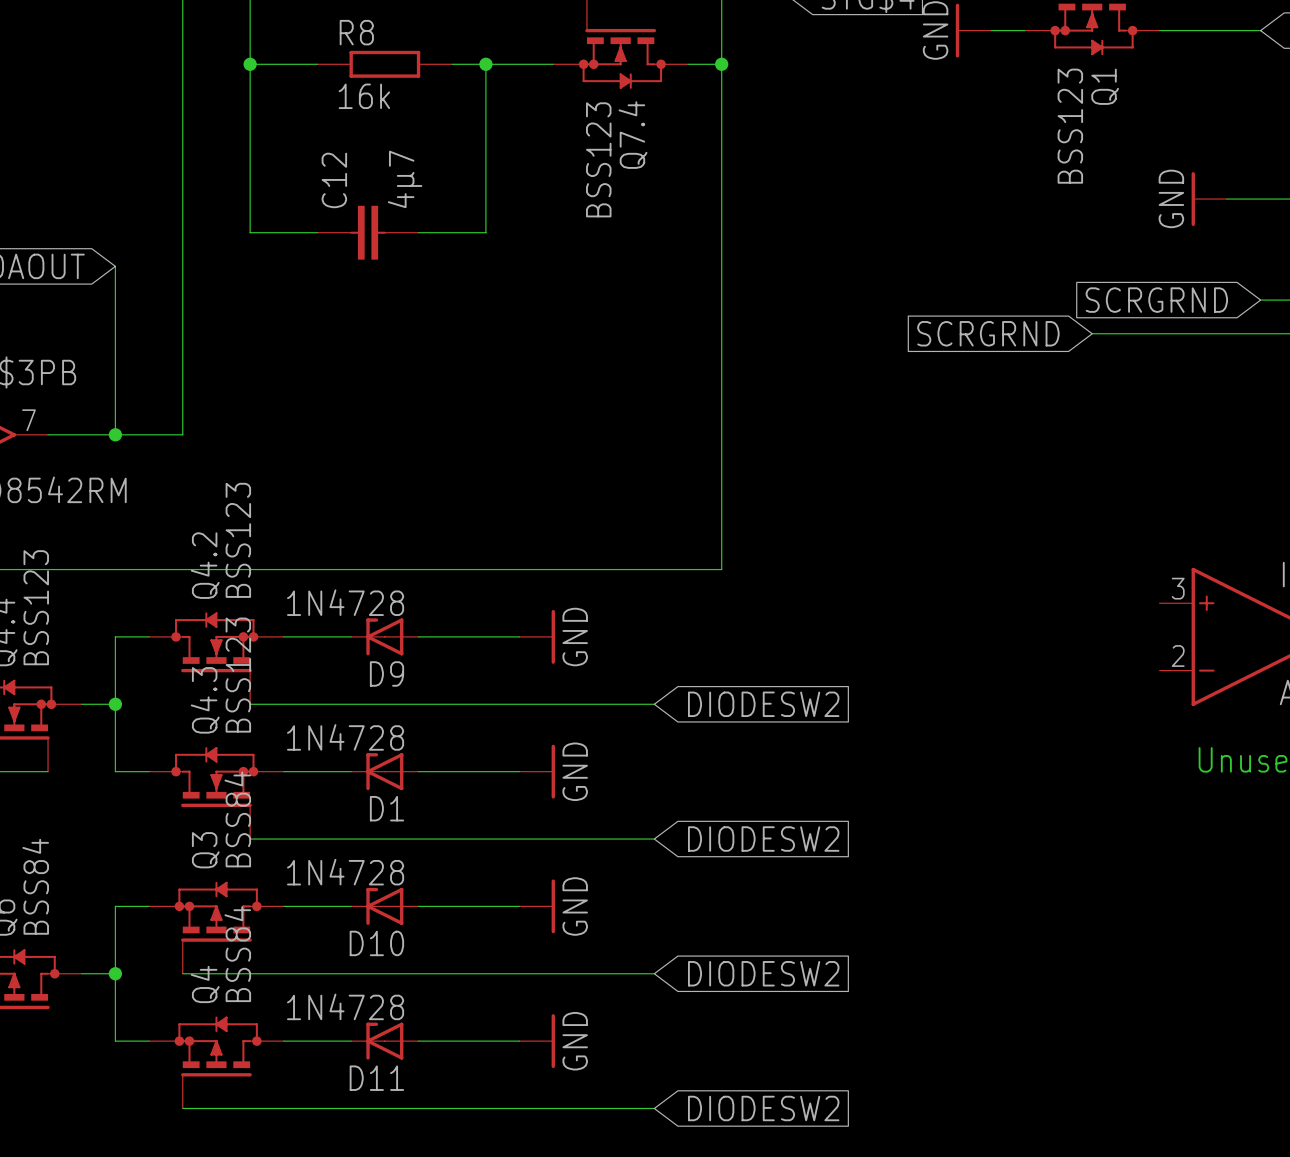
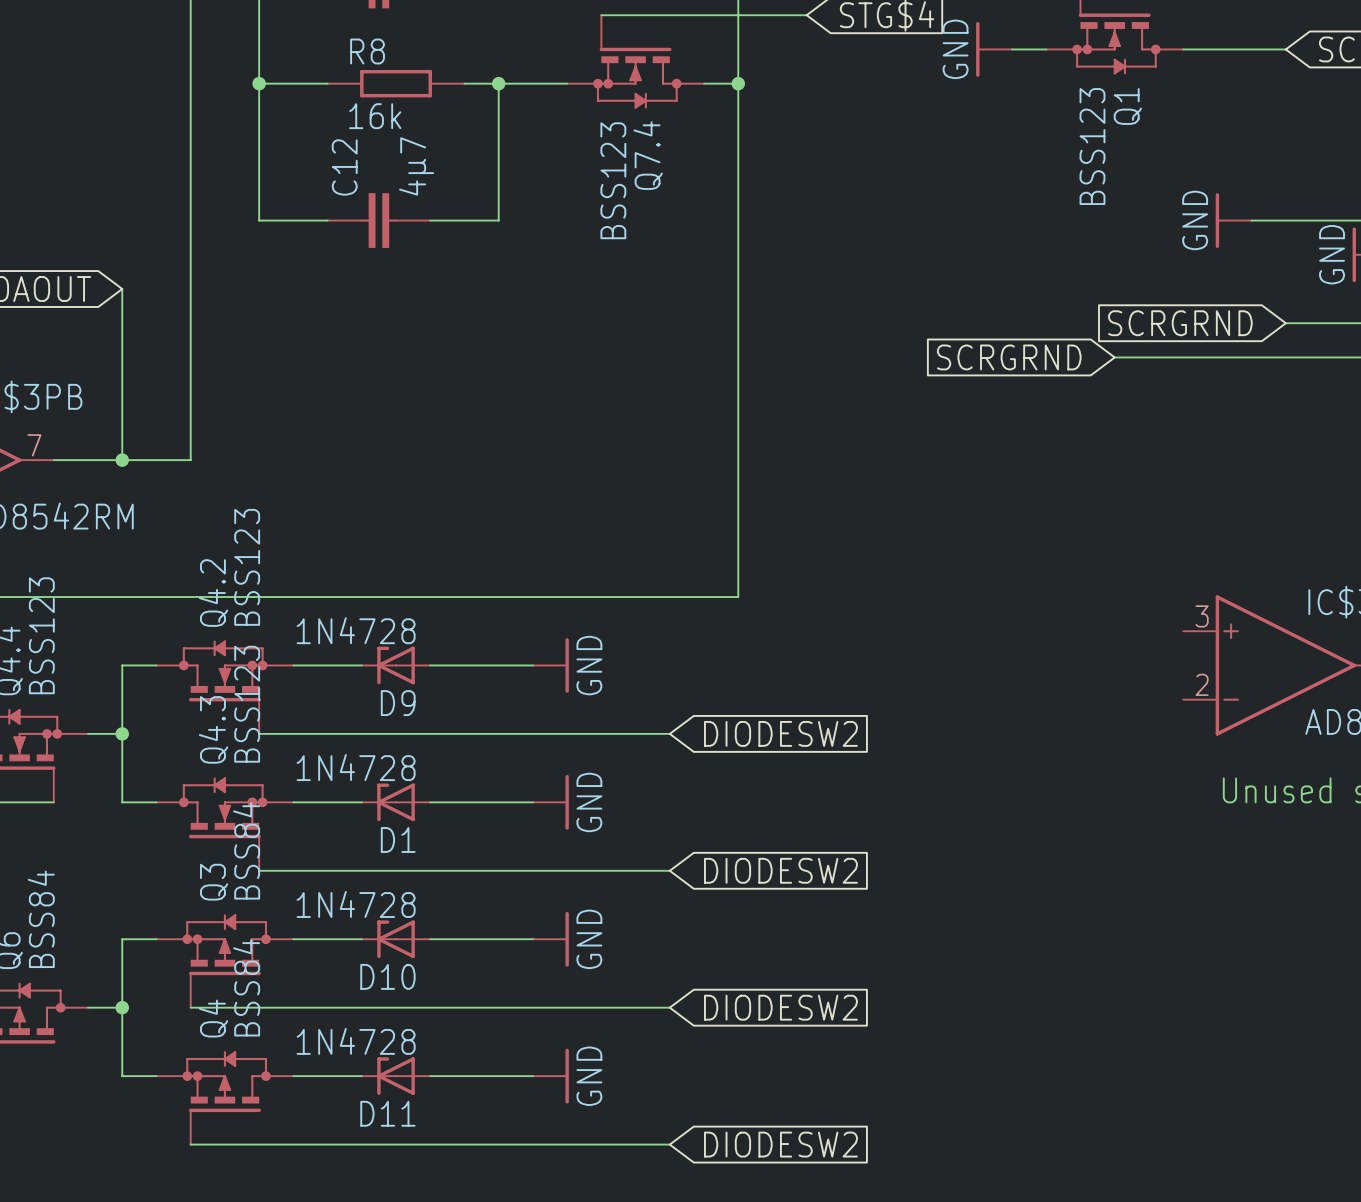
wire: (250, 199) (250, 232) (317, 232) -> (259, 220) (327, 220)
wire: (485, 199) (485, 232) (418, 232) -> (498, 220) (430, 220)
C12 position: (368, 232) -> (378, 220)

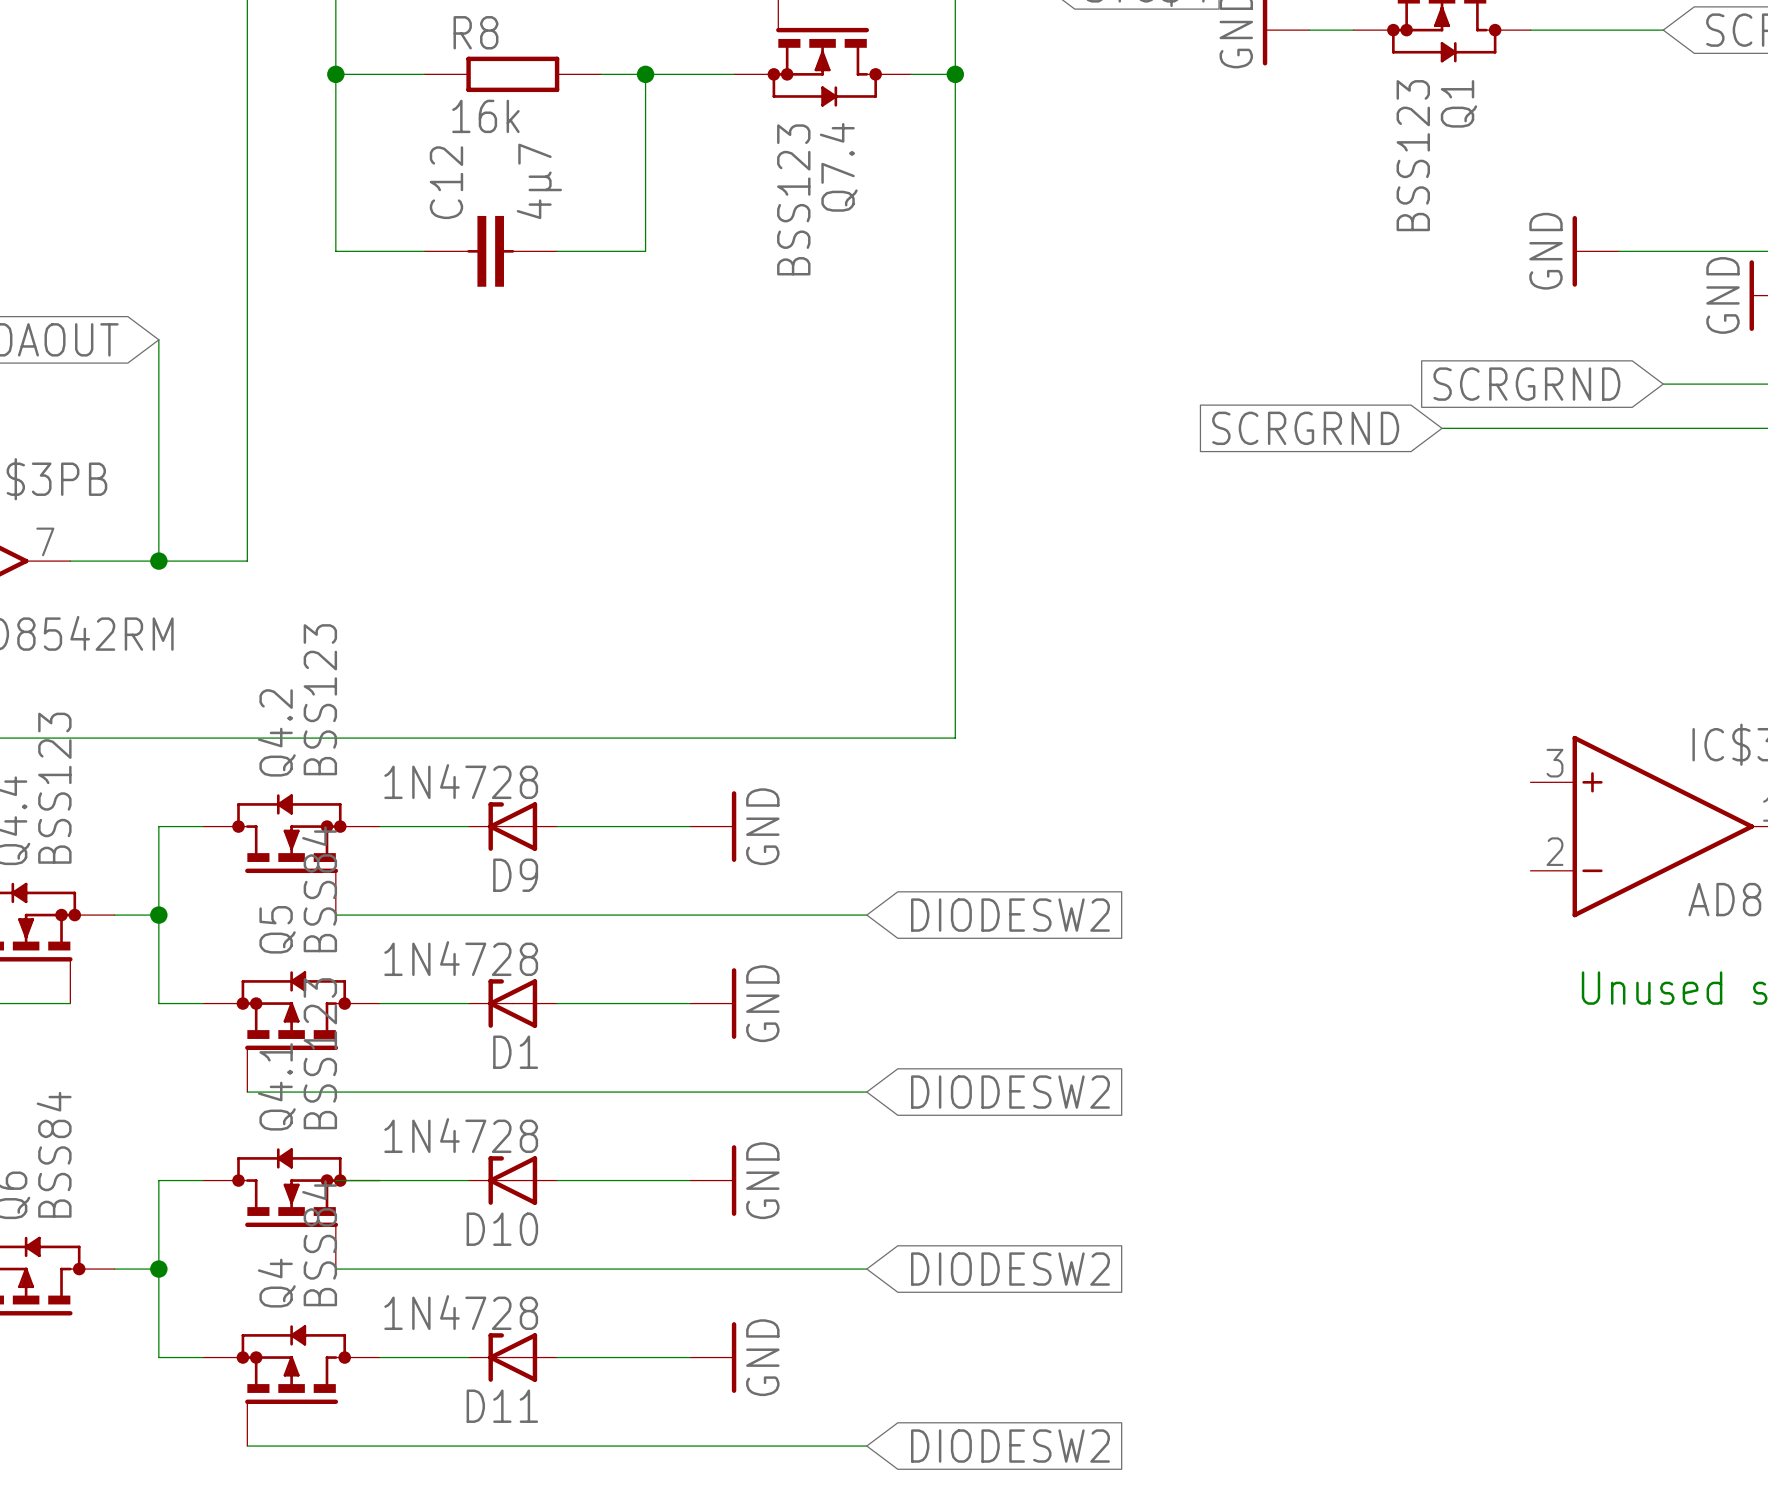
Q4.3: BSS123 (224, 824) -> none
Q5: none -> BSS84 (291, 1031)
Q3: BSS84 (224, 960) -> none
Q4.1: none -> BSS123 (291, 1208)
wire: (190, 1007) (259, 1007) -> (247, 1092) (335, 1092)

